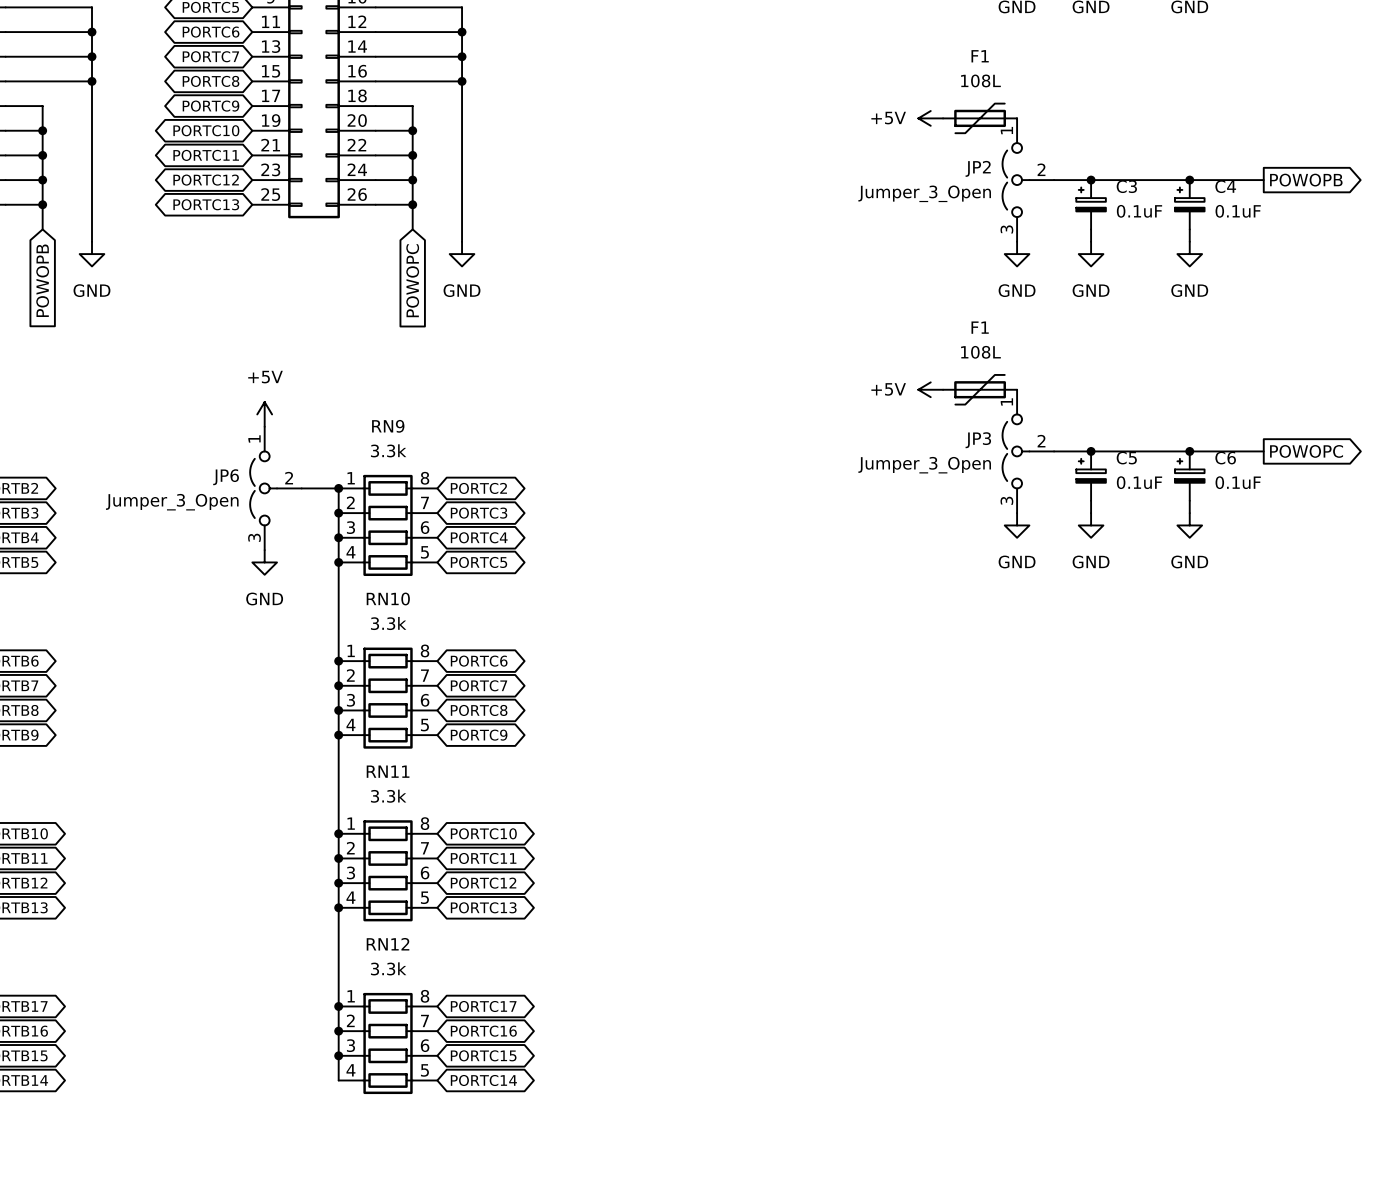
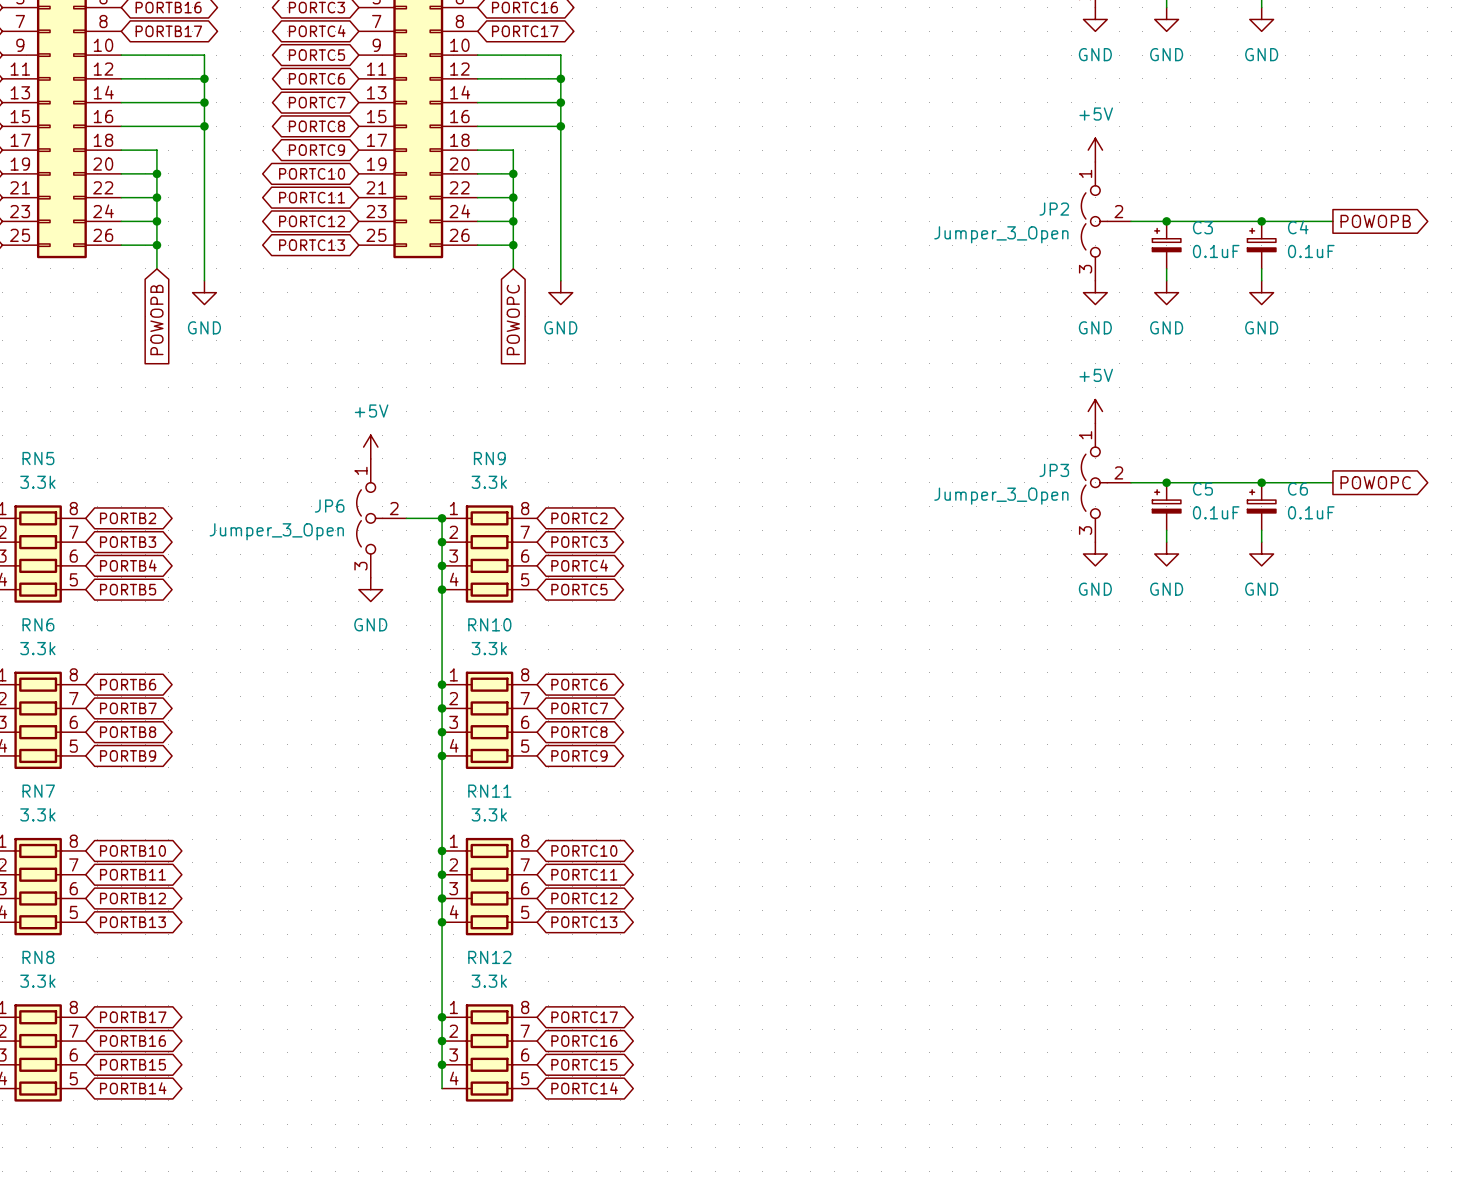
power symbol rotation: 0° (930, 118) -> 90° clockwise (1095, 150)
power symbol position: +5V (930, 118) -> +5V (1095, 150)
F1: 108L (980, 118) -> none
power symbol rotation: 0° (930, 389) -> 90° clockwise (1095, 411)
power symbol position: +5V (930, 389) -> +5V (1095, 411)
F1: 108L (980, 389) -> none

